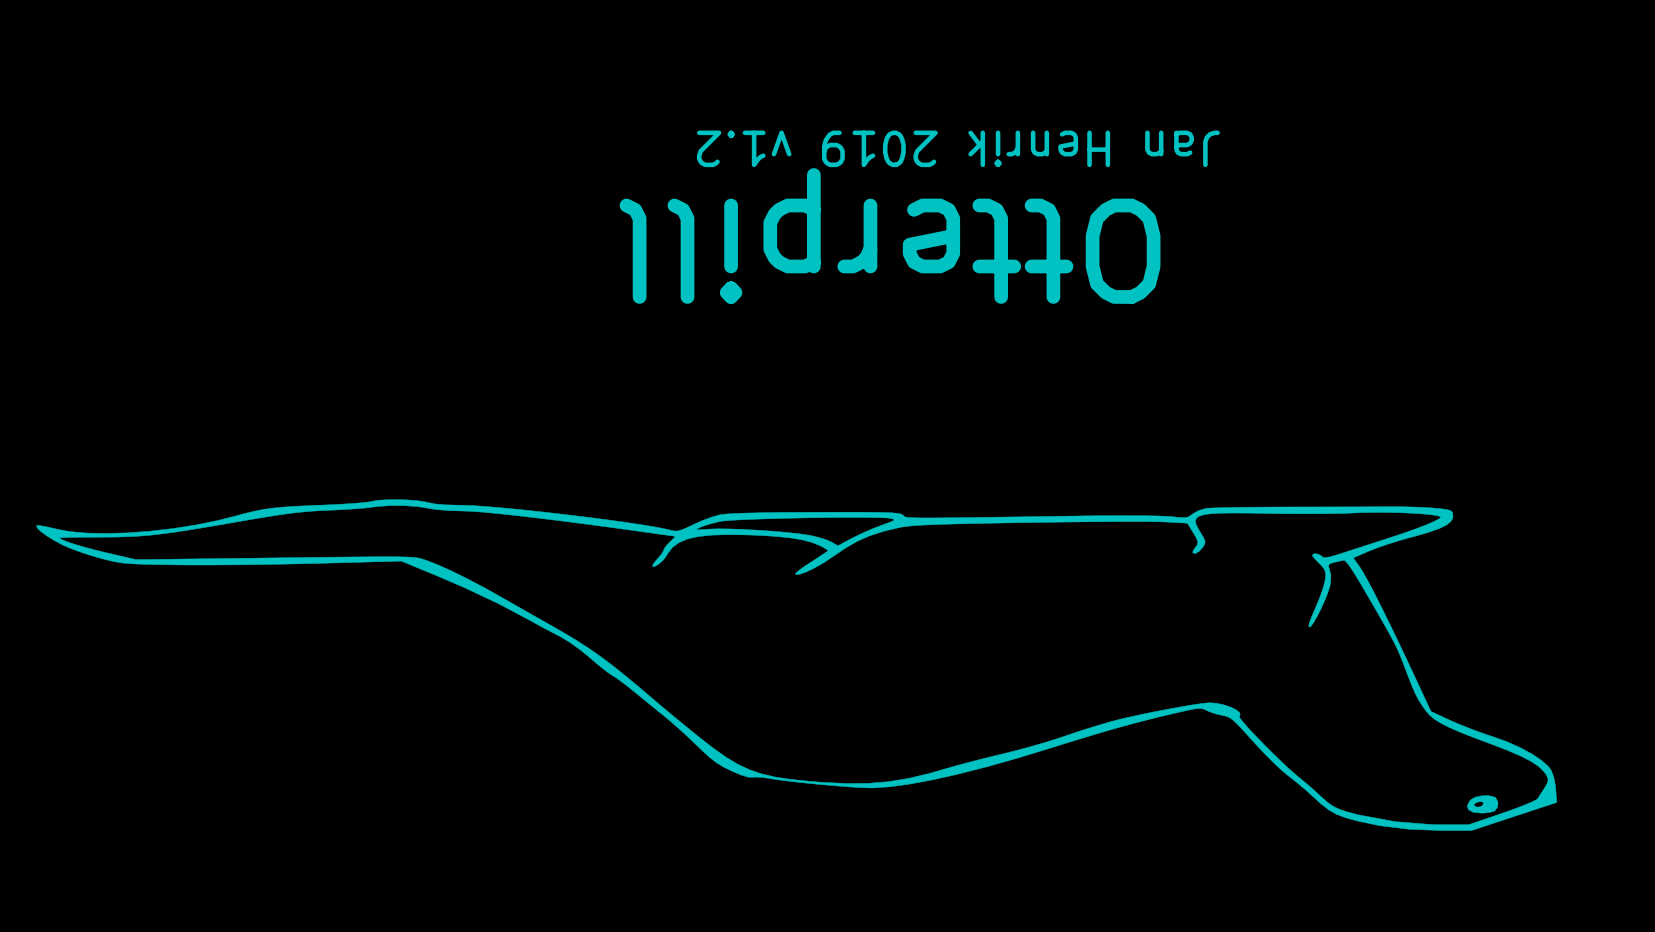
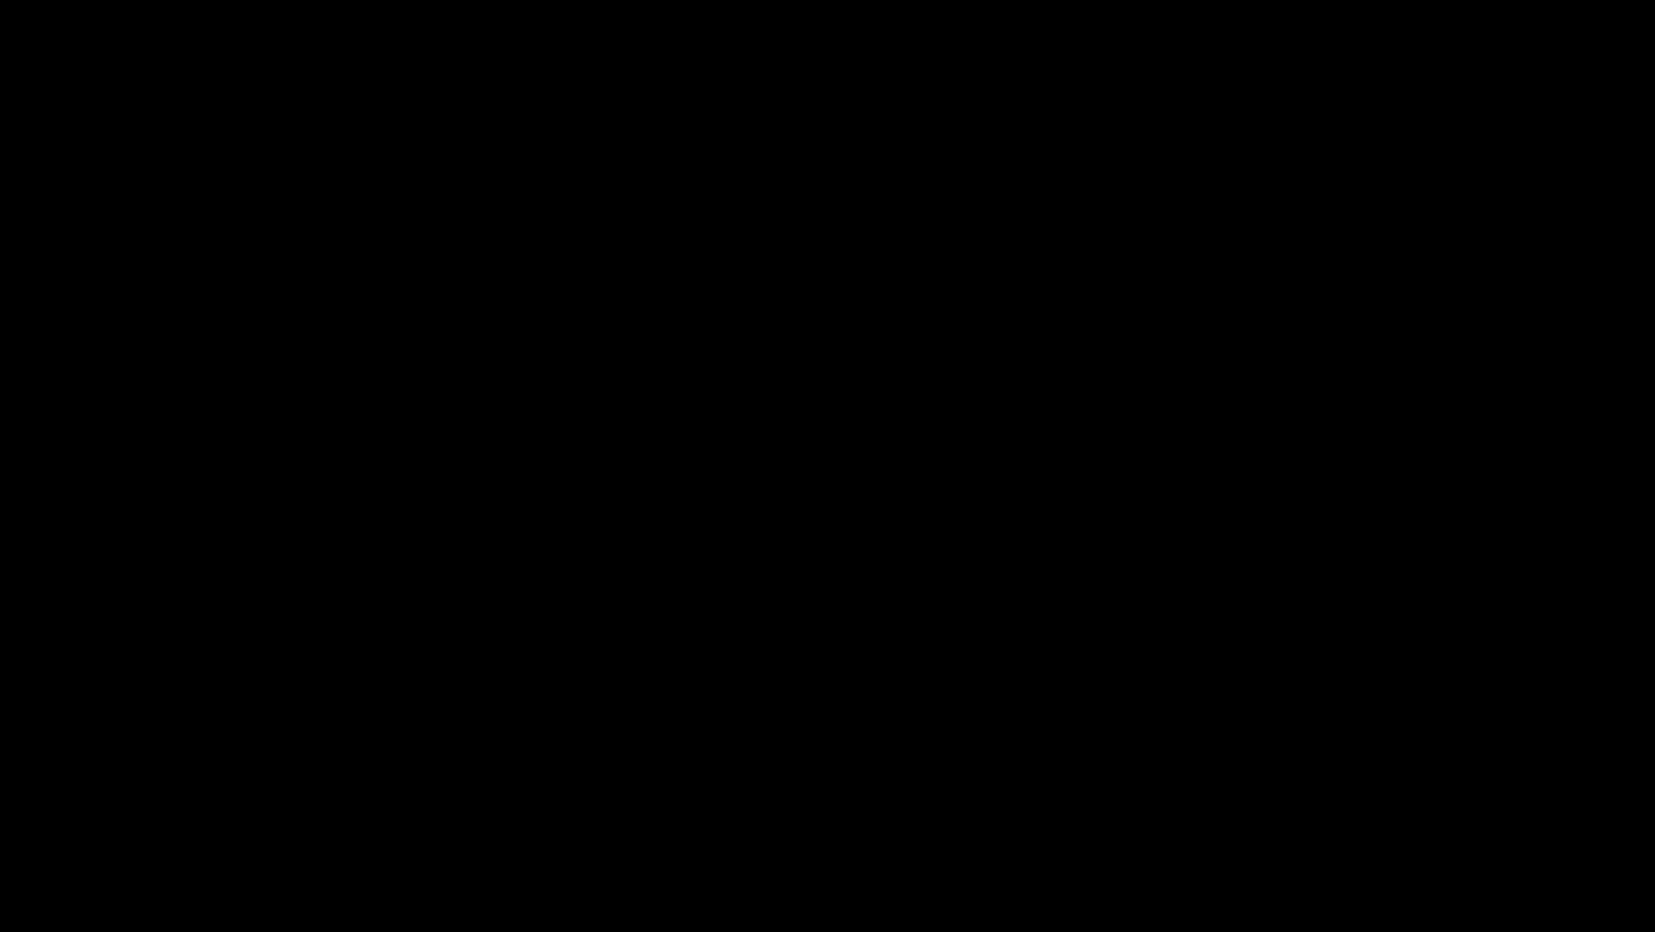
text: Jan Henrik 2019 v1.2 (958, 148) -> none
text: Otterpill (890, 235) -> none
drawing: [36, 499, 1557, 831] -> none

